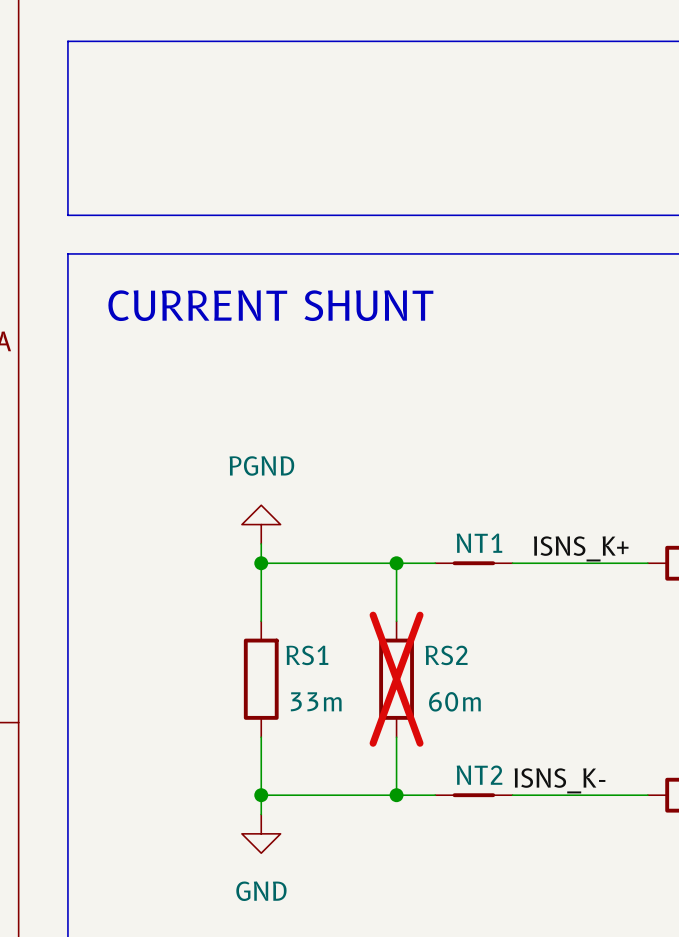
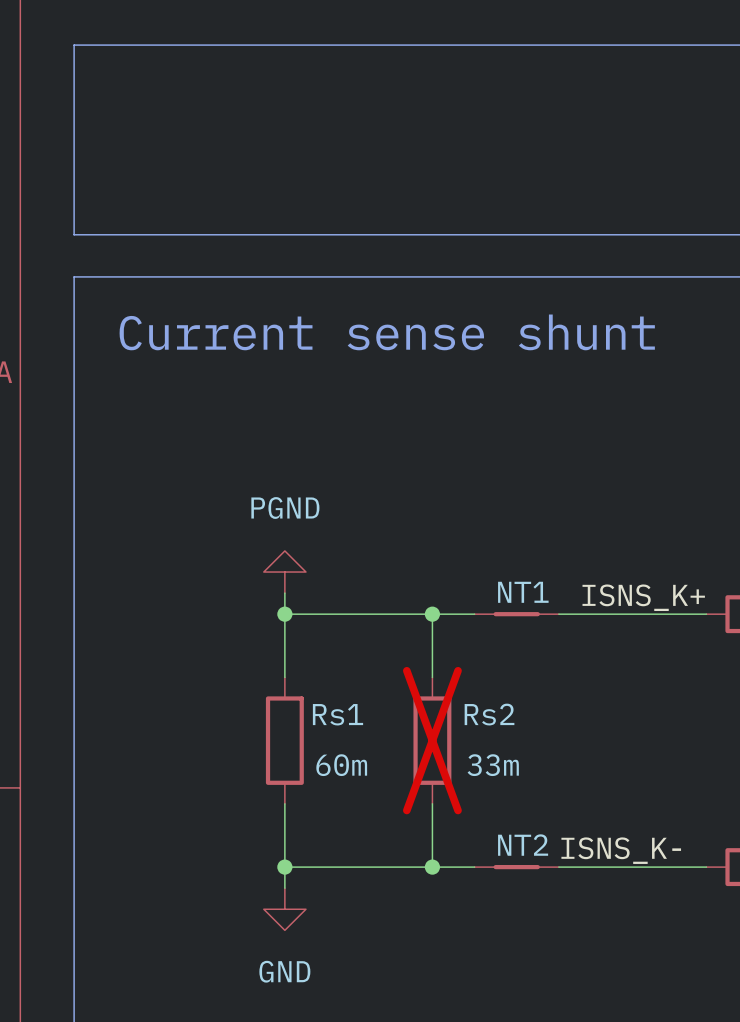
text: CURRENT SHUNT (270, 305) -> Current sense shunt (387, 332)
RS1 name: RS1 (307, 655) -> Rs1 (338, 714)
RS2 name: RS2 (446, 655) -> Rs2 (489, 714)
RS1 value: 33m (316, 701) -> 60m (341, 765)
RS2 value: 60m (454, 701) -> 33m (493, 765)

